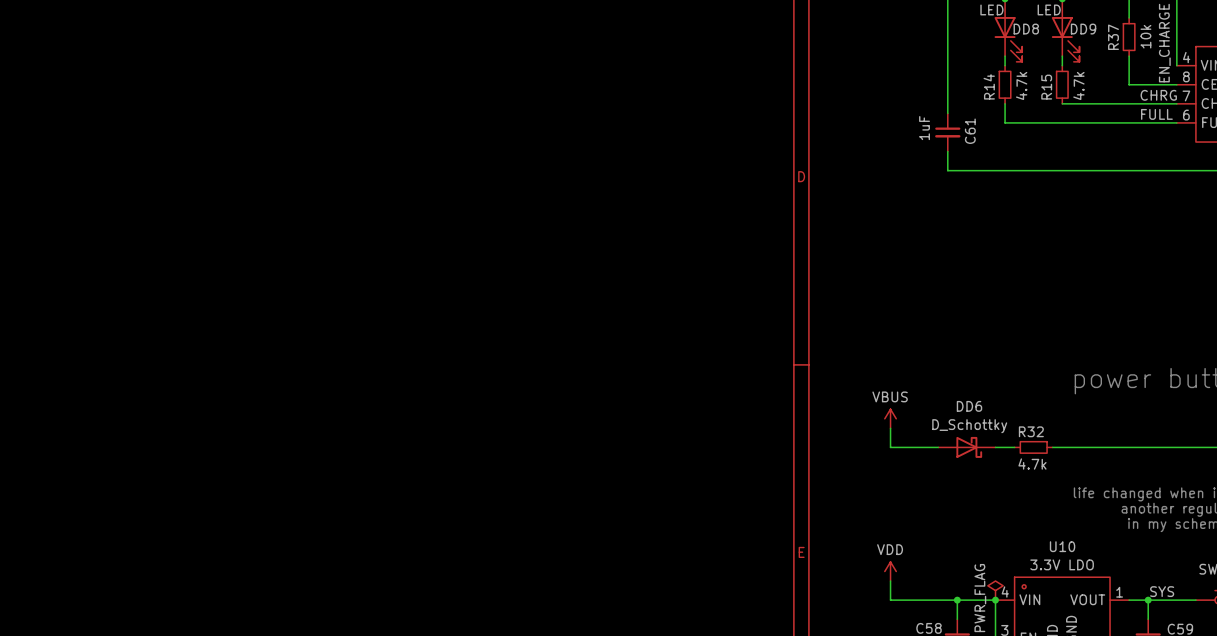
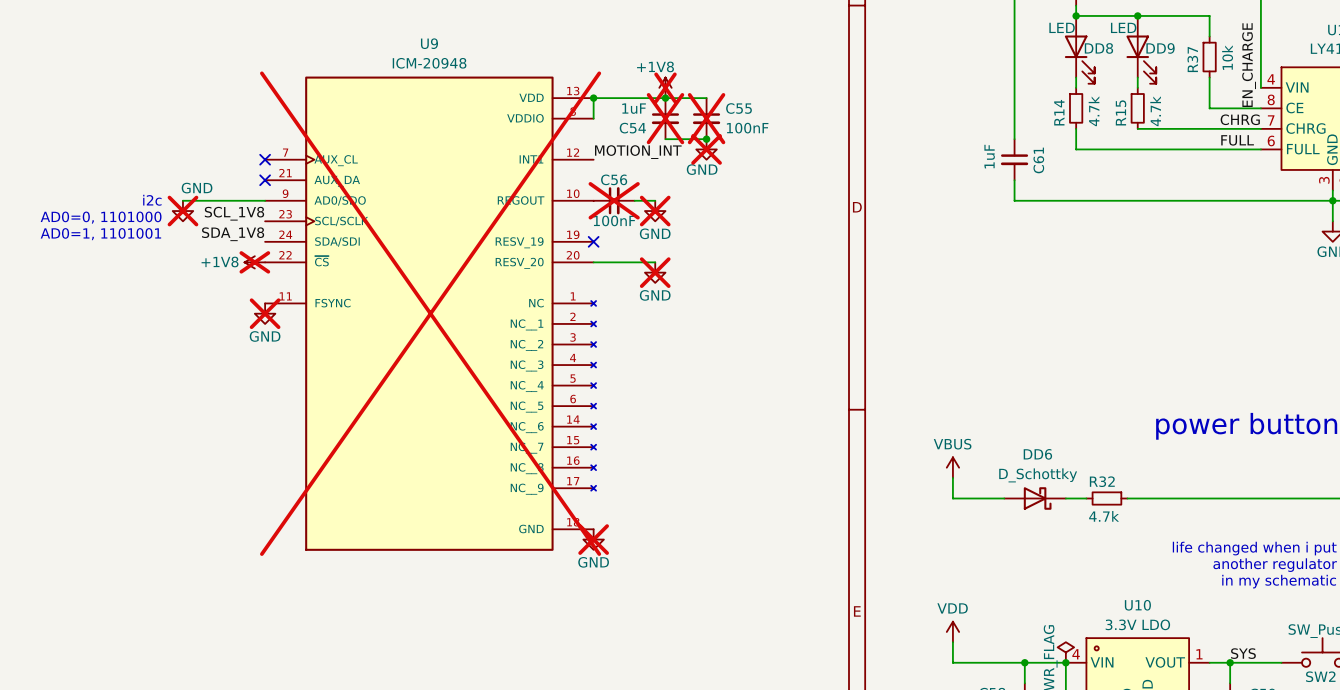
power symbol: none -> +1V8 (665, 87)
junction: none -> (593, 98)
junction: none -> (665, 98)
wire: none -> (706, 98) (593, 98) (593, 118)
C54: none -> 1uF (665, 118)
C55: none -> 100nF (706, 118)
wire: none -> (665, 139) (706, 139)
junction: none -> (706, 139)
power symbol: none -> GND (706, 149)
label: none -> MOTION_INT (638, 152)
no-connect mark: none -> (265, 159)
no-connect mark: none -> (265, 180)
text: none -> i2c (152, 200)
wire: none -> (182, 200) (265, 200)
C56: none -> 100nF (614, 200)
wire: none -> (634, 200) (655, 200)
power symbol: none -> GND (182, 211)
power symbol: none -> GND (655, 211)
label: none -> SCL_1V8 (234, 213)
text: none -> AD0=0, 1101000 (101, 217)
label: none -> SDA_1V8 (233, 234)
text: none -> AD0=1, 1101001 (100, 234)
no-connect mark: none -> (593, 241)
power symbol: none -> +1V8 (254, 262)
wire: none -> (593, 262) (655, 262)
power symbol: none -> GND (655, 272)
power symbol: none -> GND (265, 313)
U9: none -> ICM-20948 (430, 313)
power symbol: none -> GND (593, 539)

